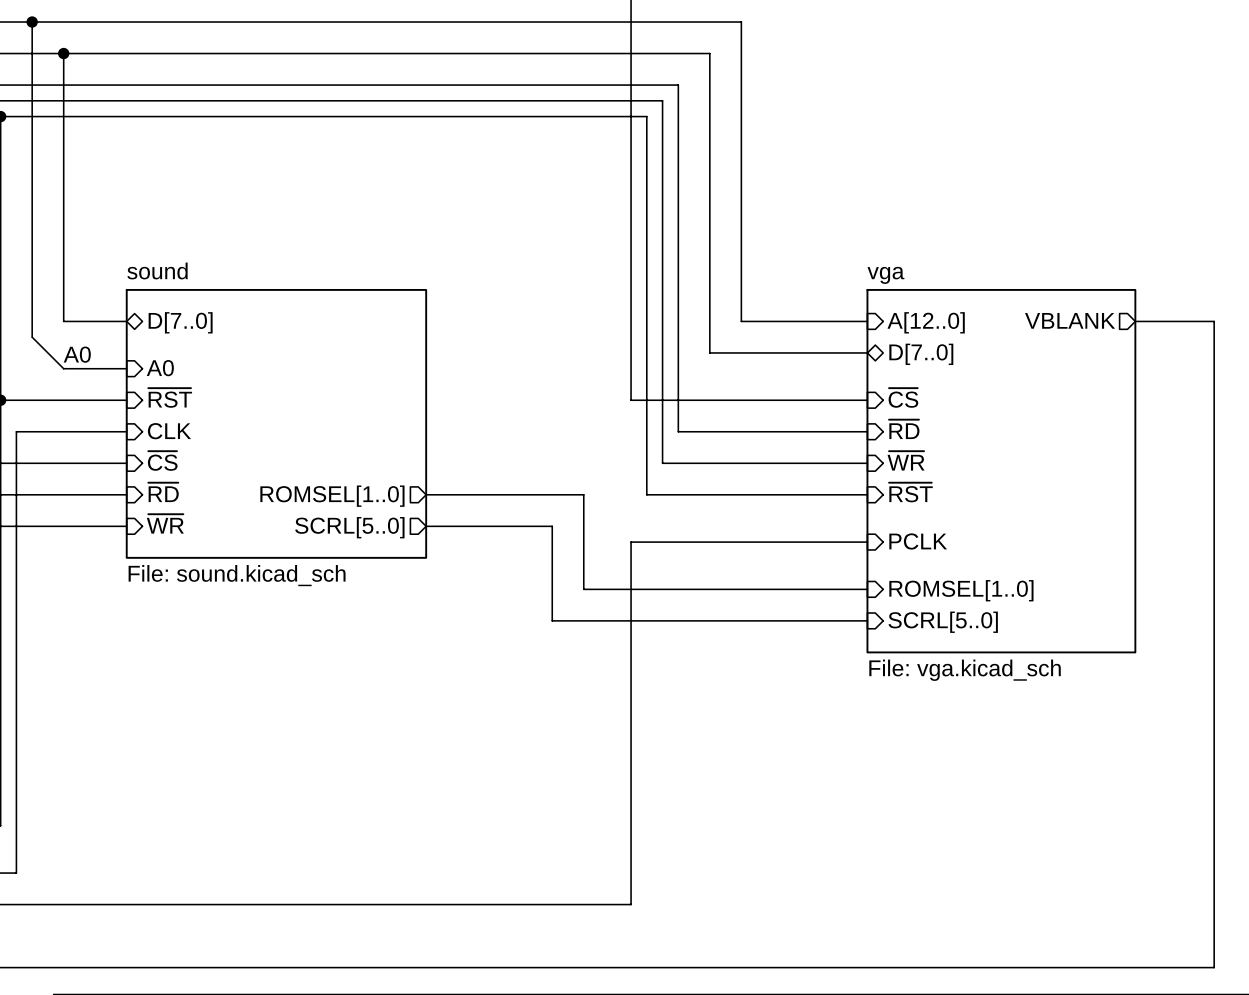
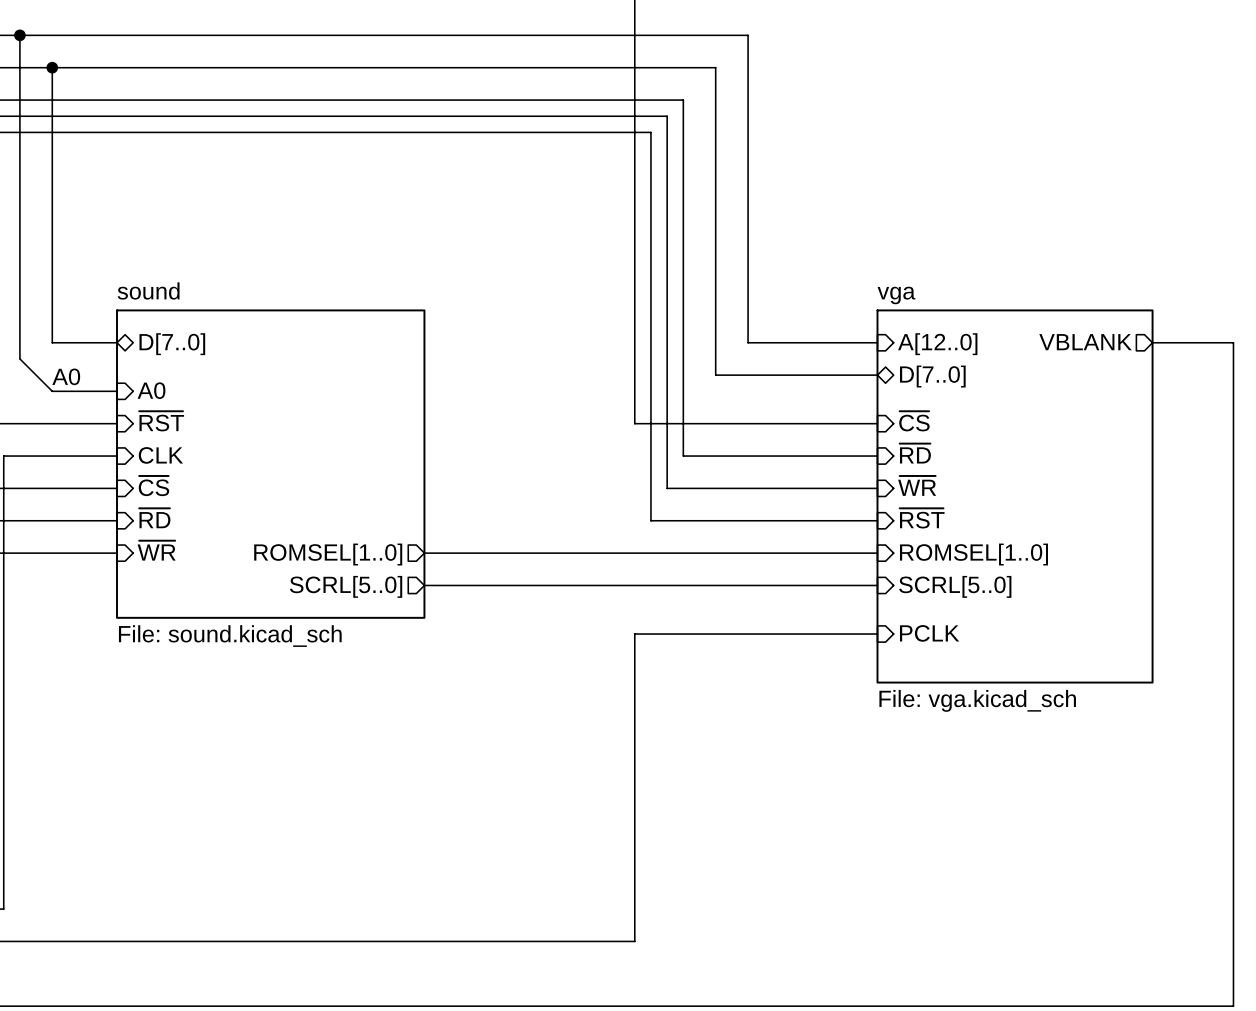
sheet sound: File: sound.kicad_sch (276, 423) -> none
sheet sound: none -> File: sound.kicad_sch (270, 464)
bus: (426, 494) (583, 494) (583, 589) (867, 589) -> none
sheet pin: ROMSEL[1..0] (332, 496) -> none
bus: (552, 526) (552, 620) (867, 620) -> (553, 553) (877, 553)
sheet pin: SCRL[5..0] (349, 527) -> ROMSEL[1..0] (328, 554)
sheet pin position: PCLK (918, 541) -> PCLK (929, 633)
wire: (867, 542) (631, 542) (631, 605) -> (877, 634) (634, 634)
bus: none -> (424, 585) (877, 585)
sheet pin: none -> SCRL[5..0] (346, 586)
sheet pin position: ROMSEL[1..0] (961, 590) -> ROMSEL[1..0] (973, 554)
sheet pin position: SCRL[5..0] (943, 622) -> SCRL[5..0] (955, 586)

